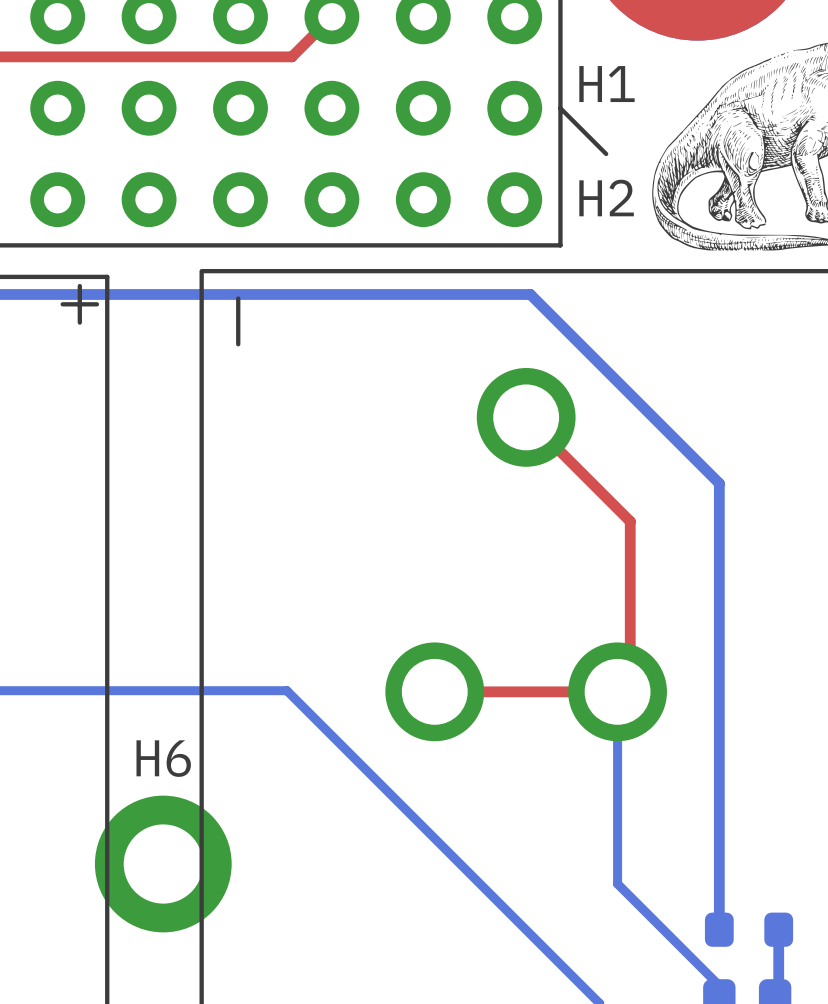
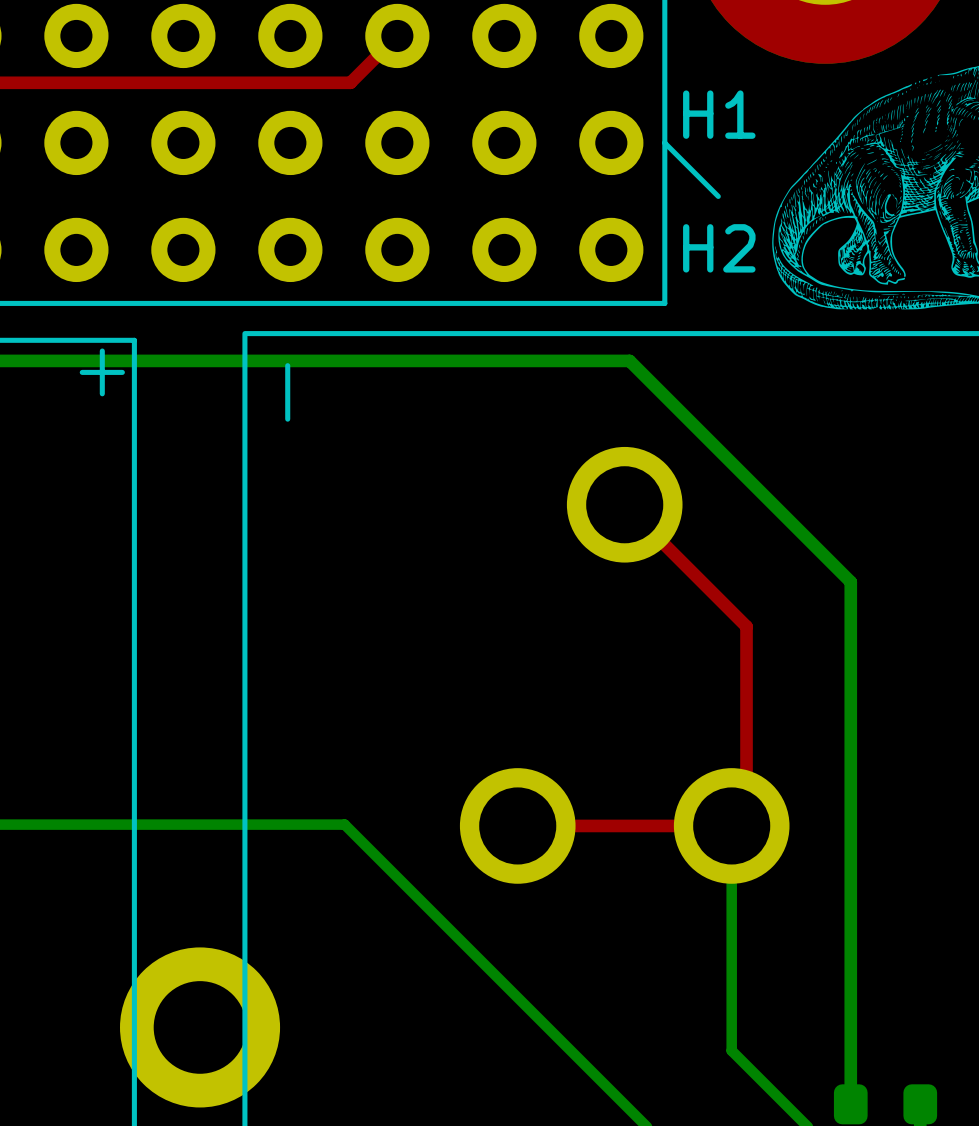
H6 name: H6 (163, 758) -> none

